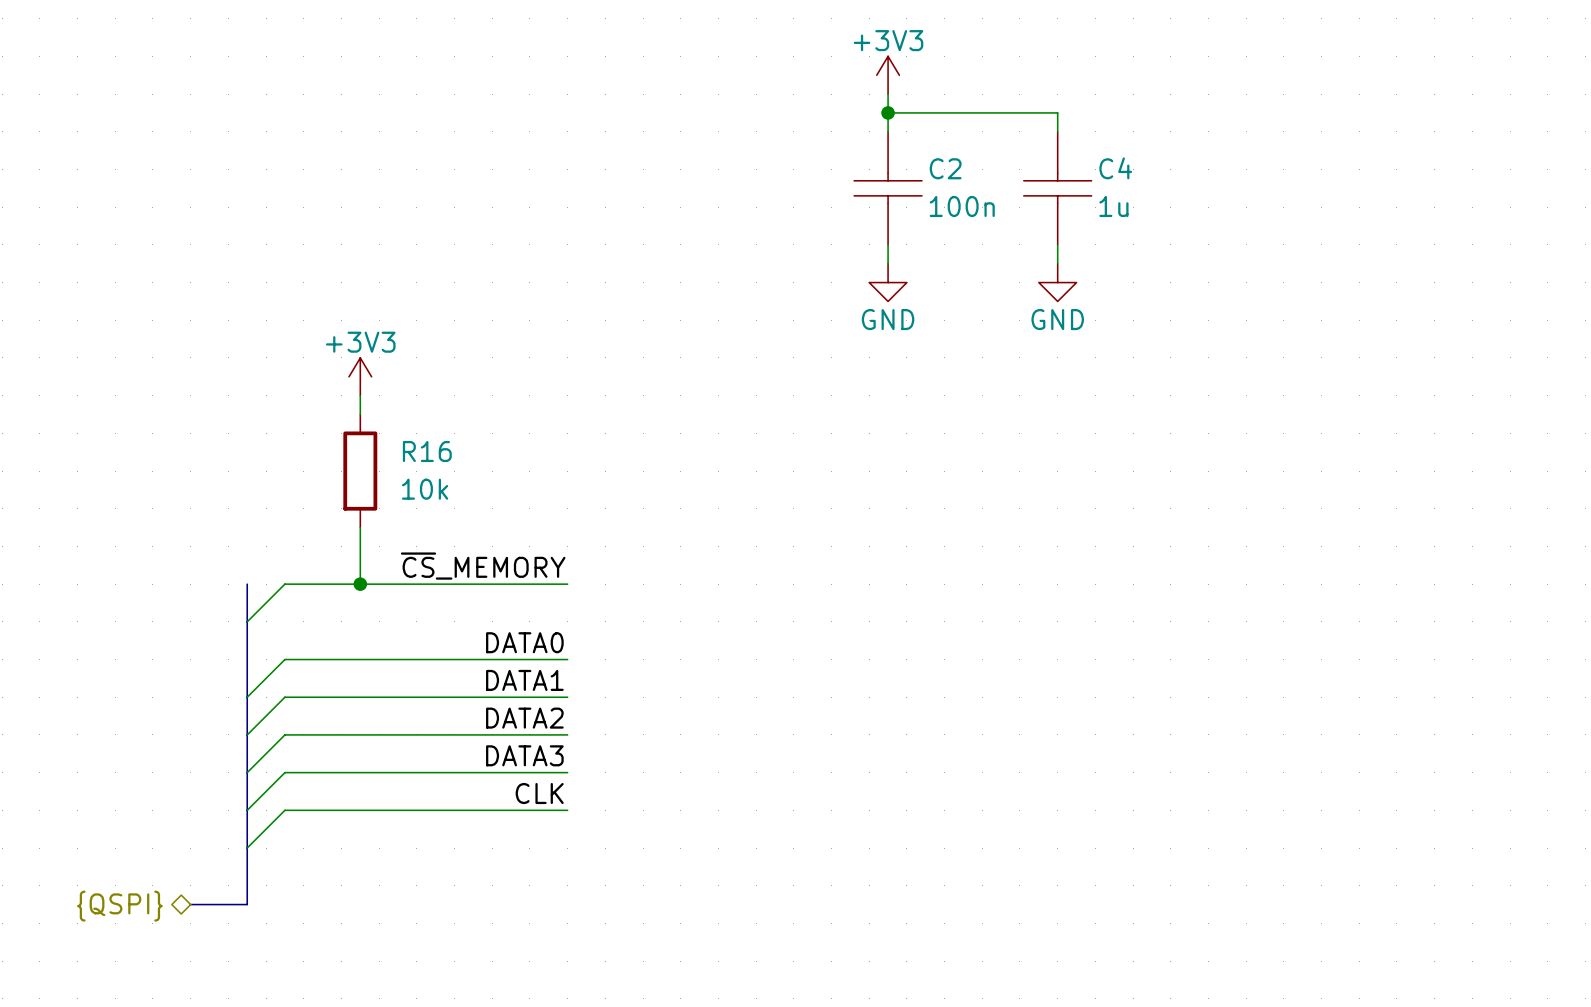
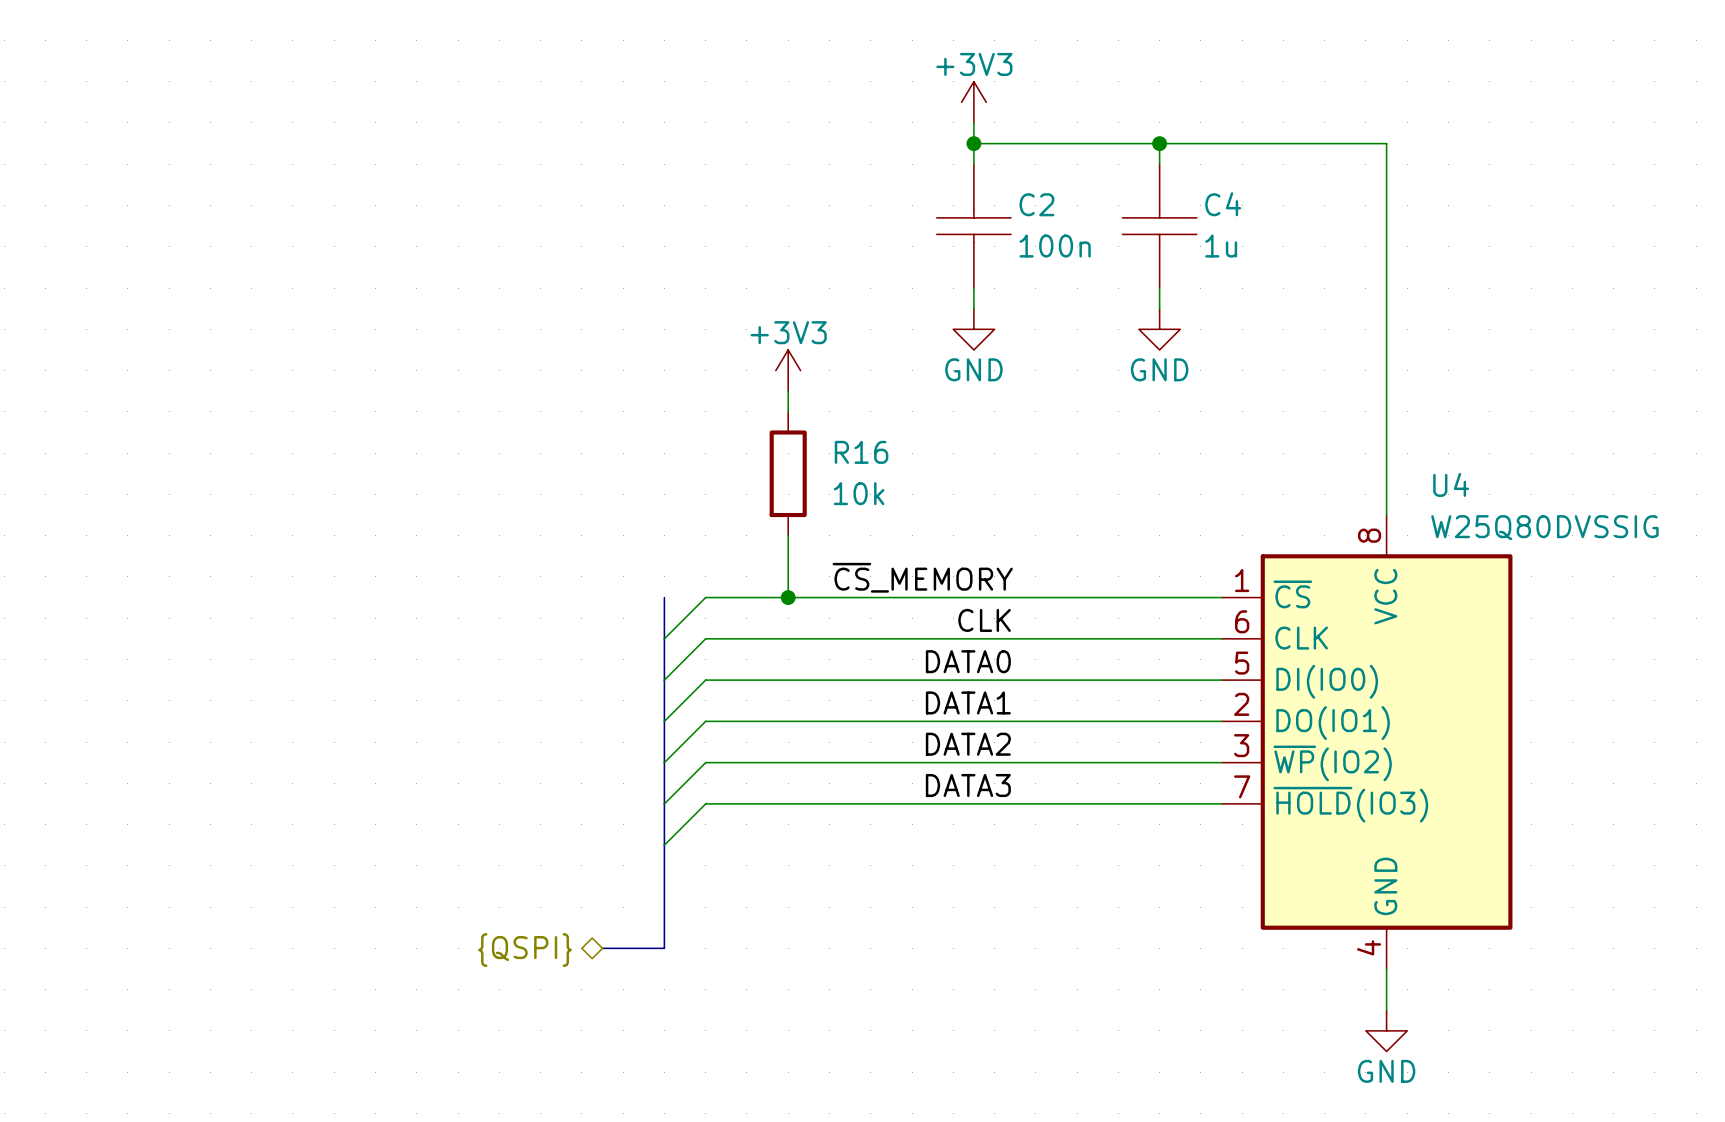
wire: none -> (1159, 143) (1386, 143) (1386, 515)
junction: none -> (1159, 143)
power symbol position: +3V3 (360, 376) -> +3V3 (788, 370)
wire: (360, 395) (360, 414) -> (788, 391) (788, 411)
R16 position: (360, 471) -> (788, 473)
wire: (360, 527) (360, 584) -> (788, 535) (788, 597)
junction: none -> (788, 597)
wire: none -> (1221, 597) (705, 597) (664, 638)
label: none -> CLK (984, 620)
wire: none -> (1221, 638) (705, 638) (664, 680)
label position: ~{CS}_MEMORY (483, 566) -> ~{CS}_MEMORY (922, 577)
bus: (247, 584) (247, 904) (190, 904) -> (664, 597) (664, 948) (602, 948)
junction: (360, 584) -> none
wire: (567, 584) (284, 584) (247, 621) -> none
wire: none -> (1221, 680) (705, 680) (664, 721)
wire: none -> (1221, 721) (705, 721) (664, 762)
label position: DATA0 (524, 642) -> DATA0 (968, 661)
wire: (567, 659) (284, 659) (247, 697) -> none
U4: none -> W25Q80DVSSIG (1366, 742)
wire: none -> (1221, 762) (705, 762) (664, 803)
label position: DATA1 (524, 680) -> DATA1 (968, 702)
wire: (567, 697) (284, 697) (247, 734) -> none
wire: none -> (1221, 803) (705, 803) (664, 845)
label position: DATA2 (524, 718) -> DATA2 (968, 744)
wire: (567, 734) (284, 734) (247, 772) -> none
label position: DATA3 (524, 755) -> DATA3 (968, 785)
wire: (567, 772) (284, 772) (247, 810) -> none
label: CLK (539, 793) -> none
wire: (567, 810) (284, 810) (247, 848) -> none
wire: none -> (1386, 968) (1386, 1010)
hierarchical label position: {QSPI} (119, 906) -> {QSPI} (525, 950)
power symbol: none -> GND (1386, 1030)

